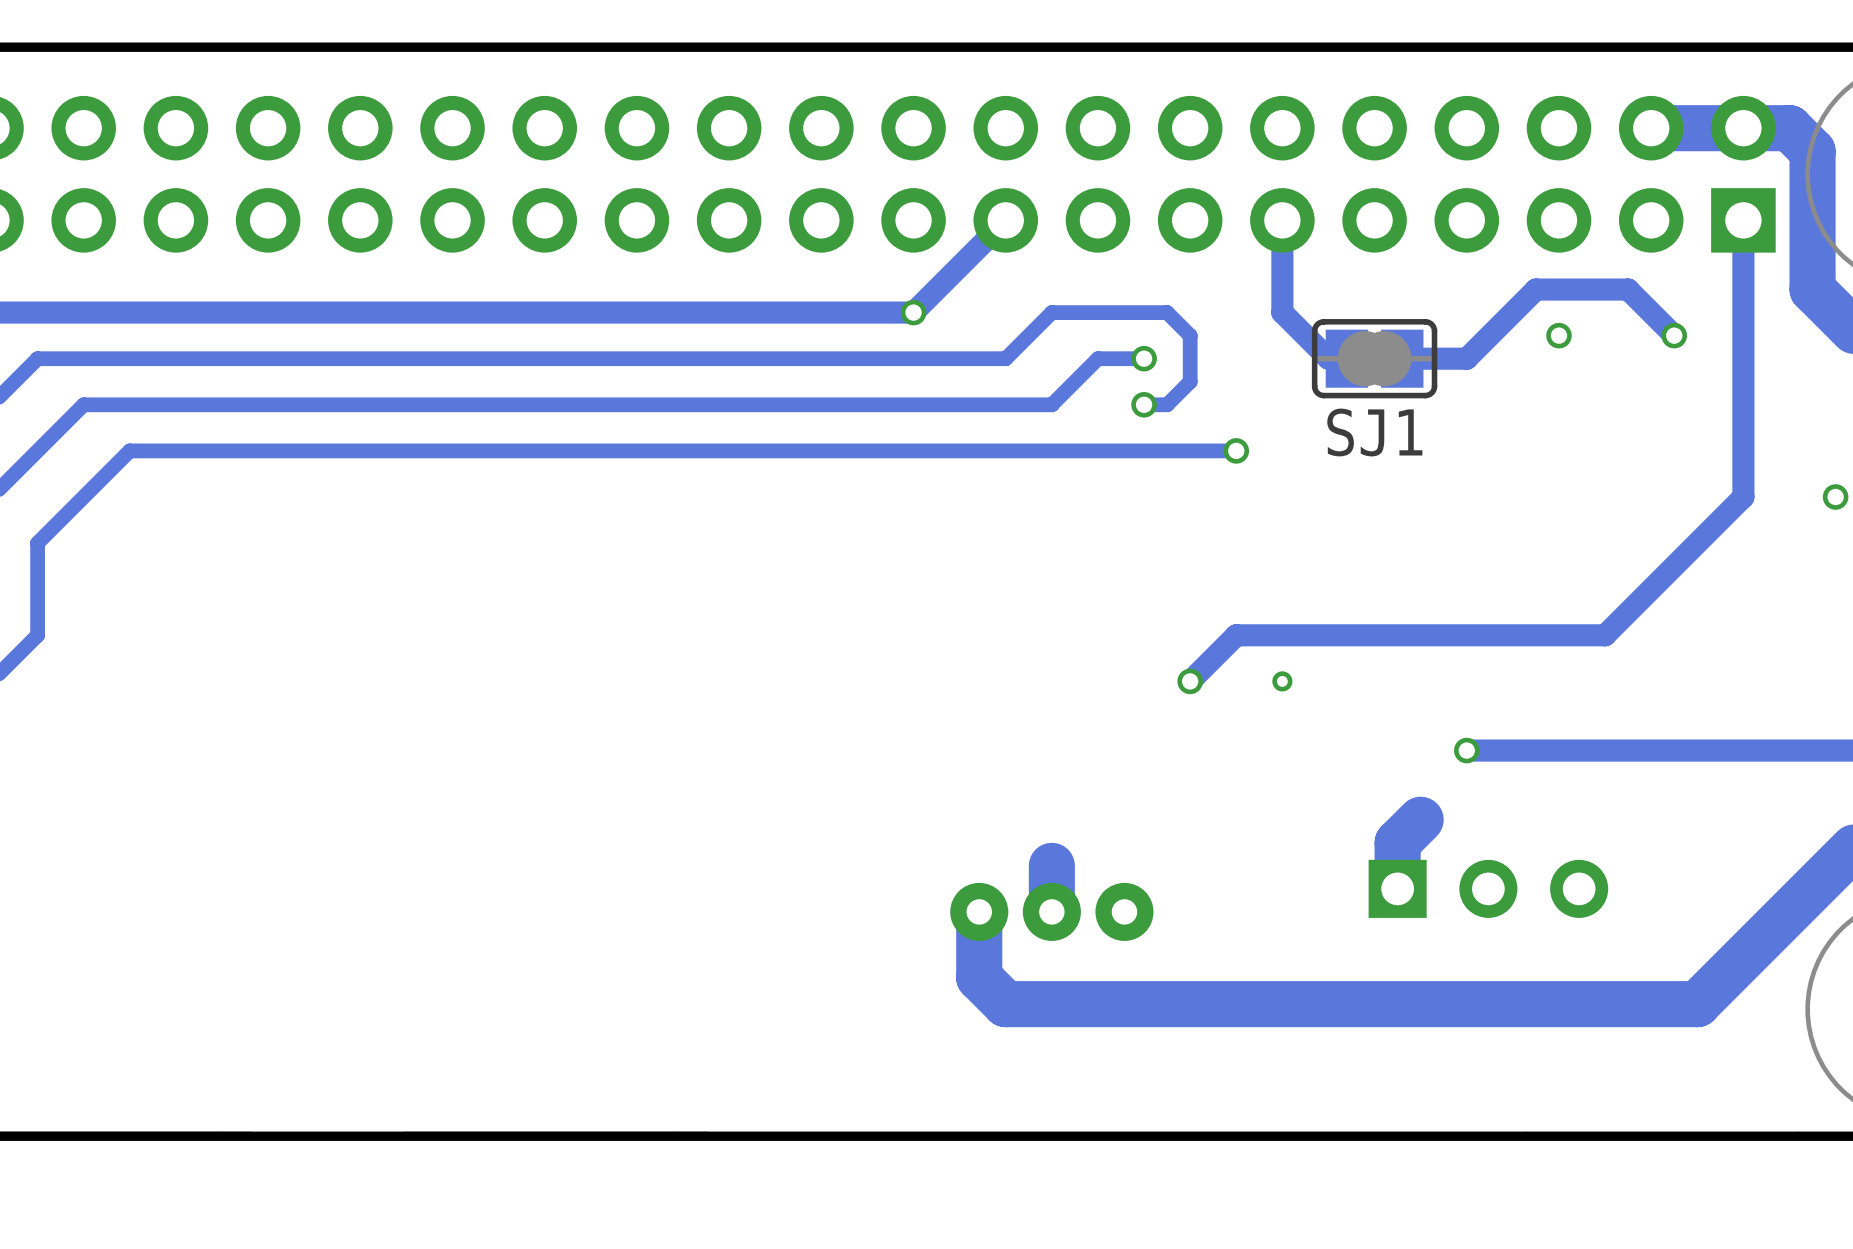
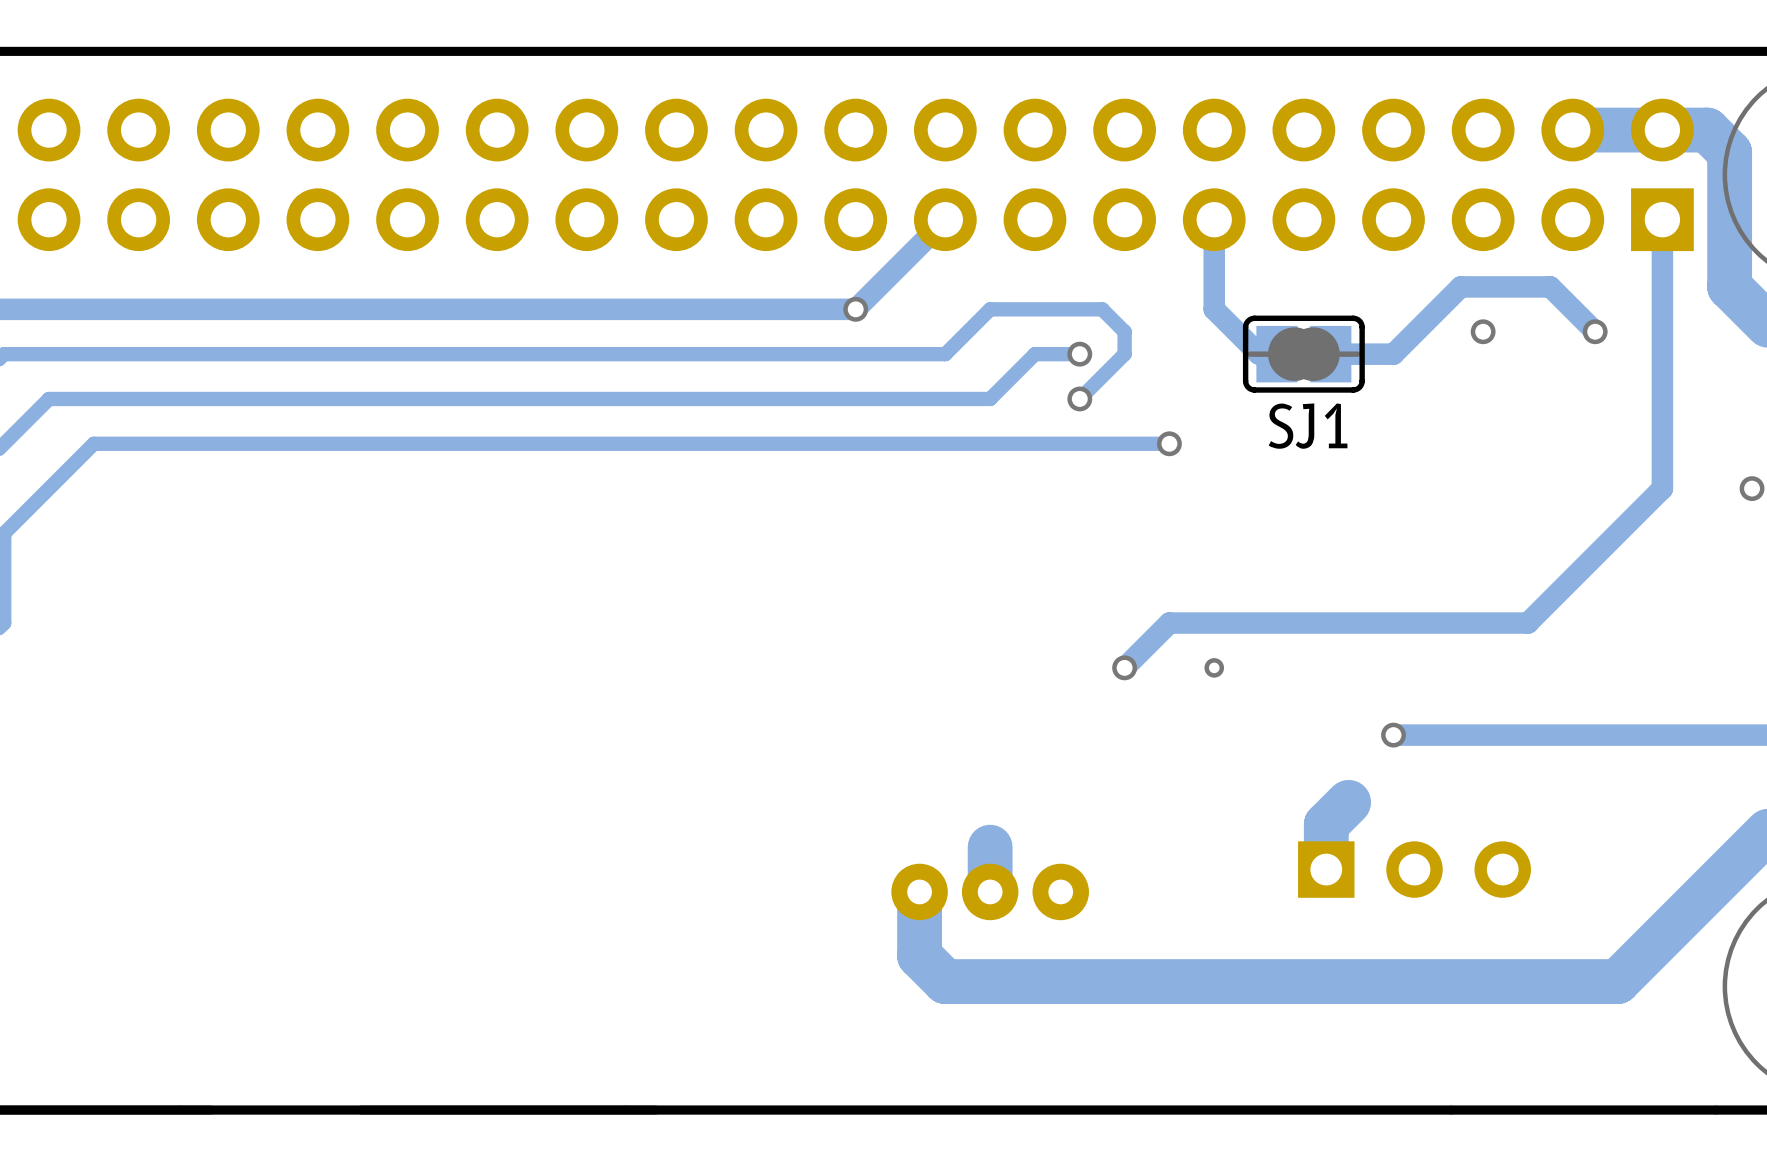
track: (1190, 358) (1190, 381) (1167, 404) (1144, 404) -> (1124, 354) (1079, 398)

